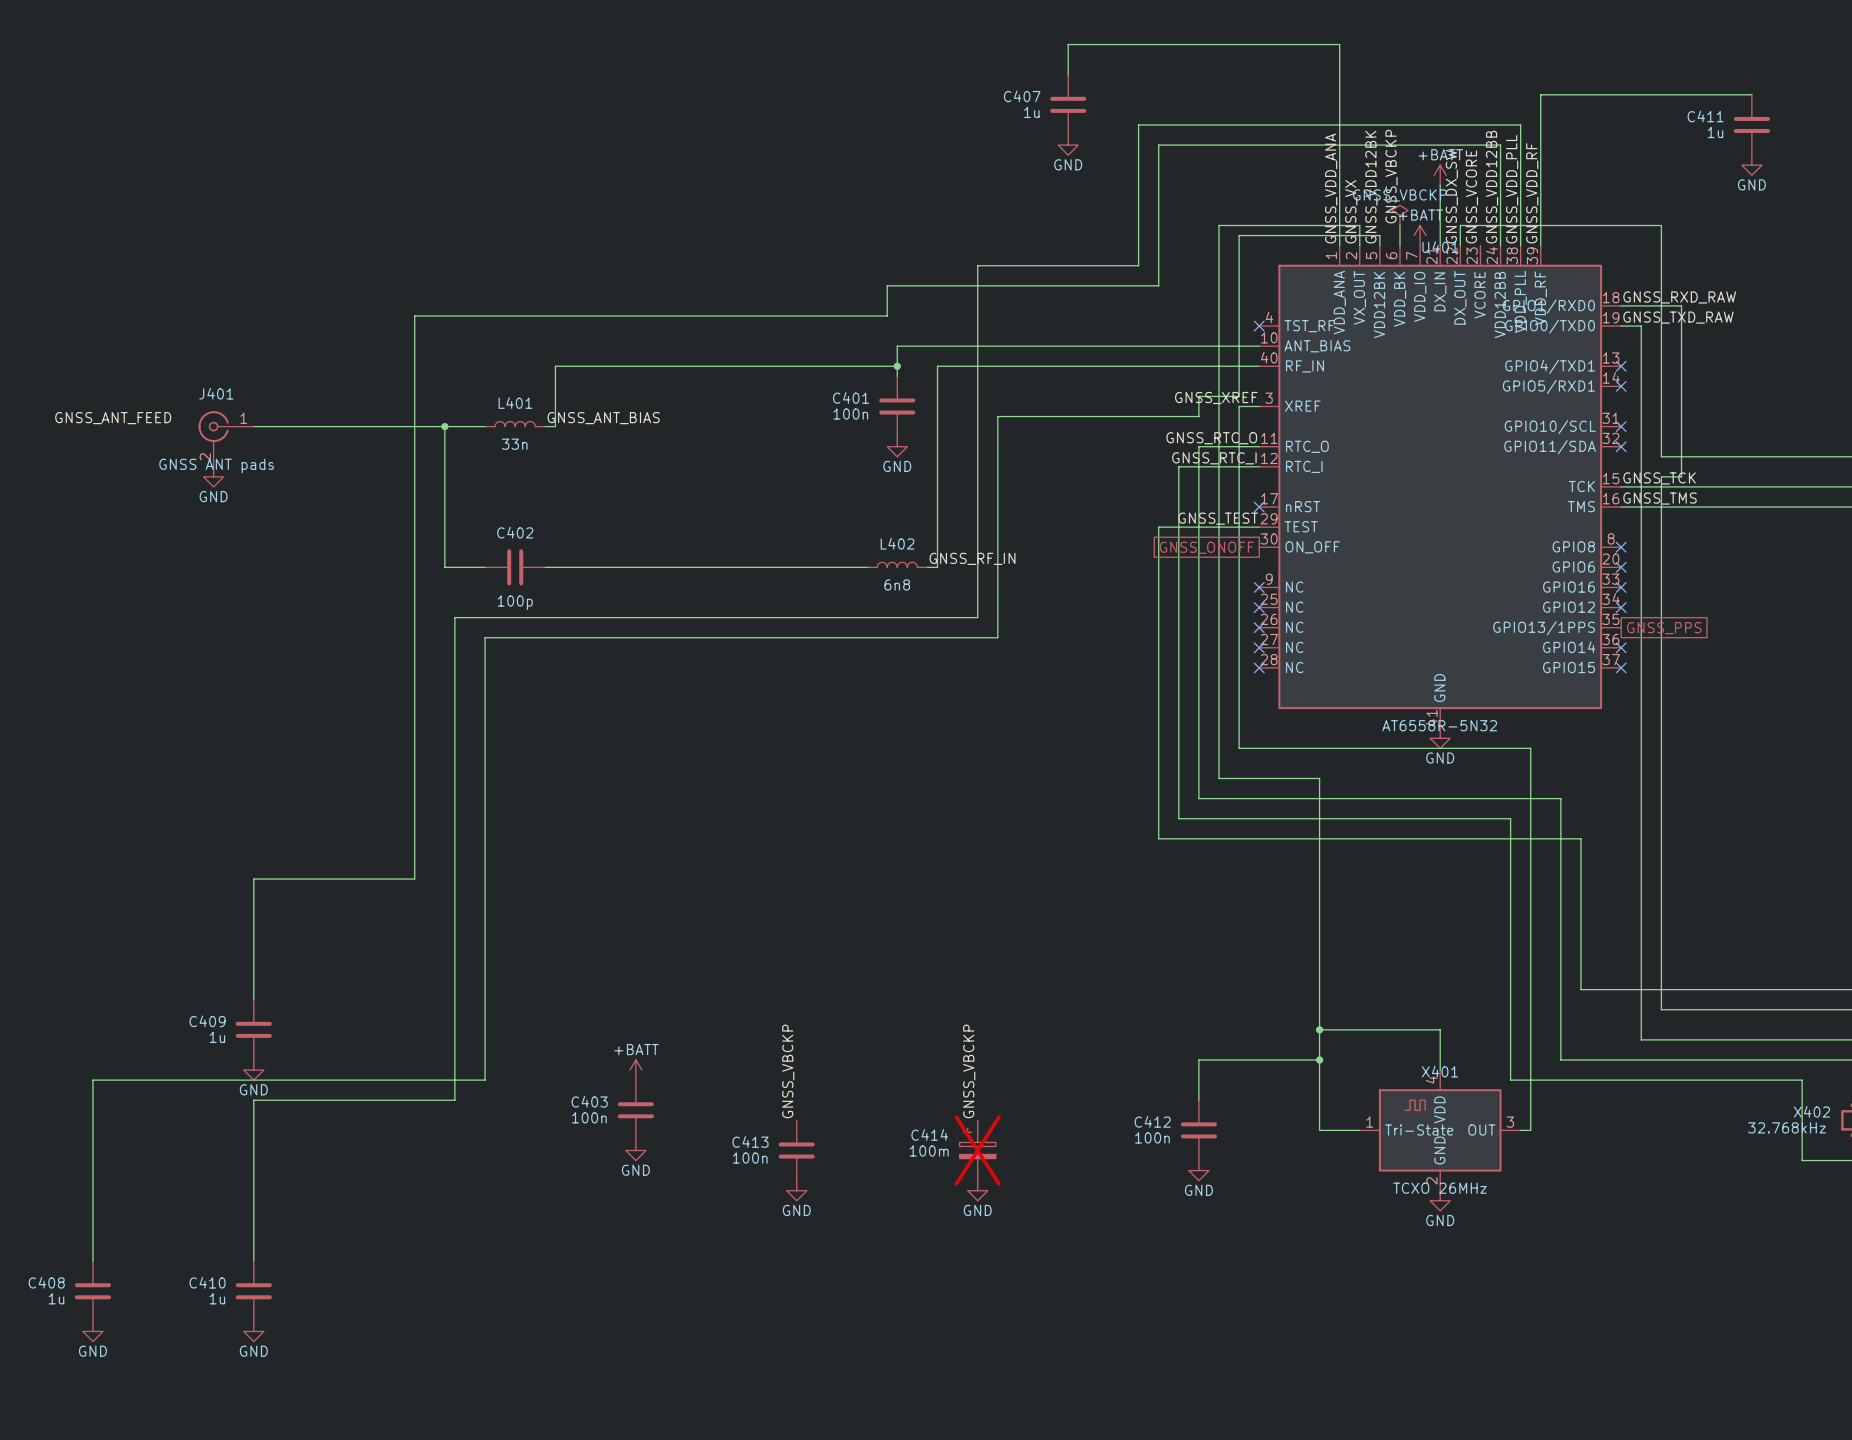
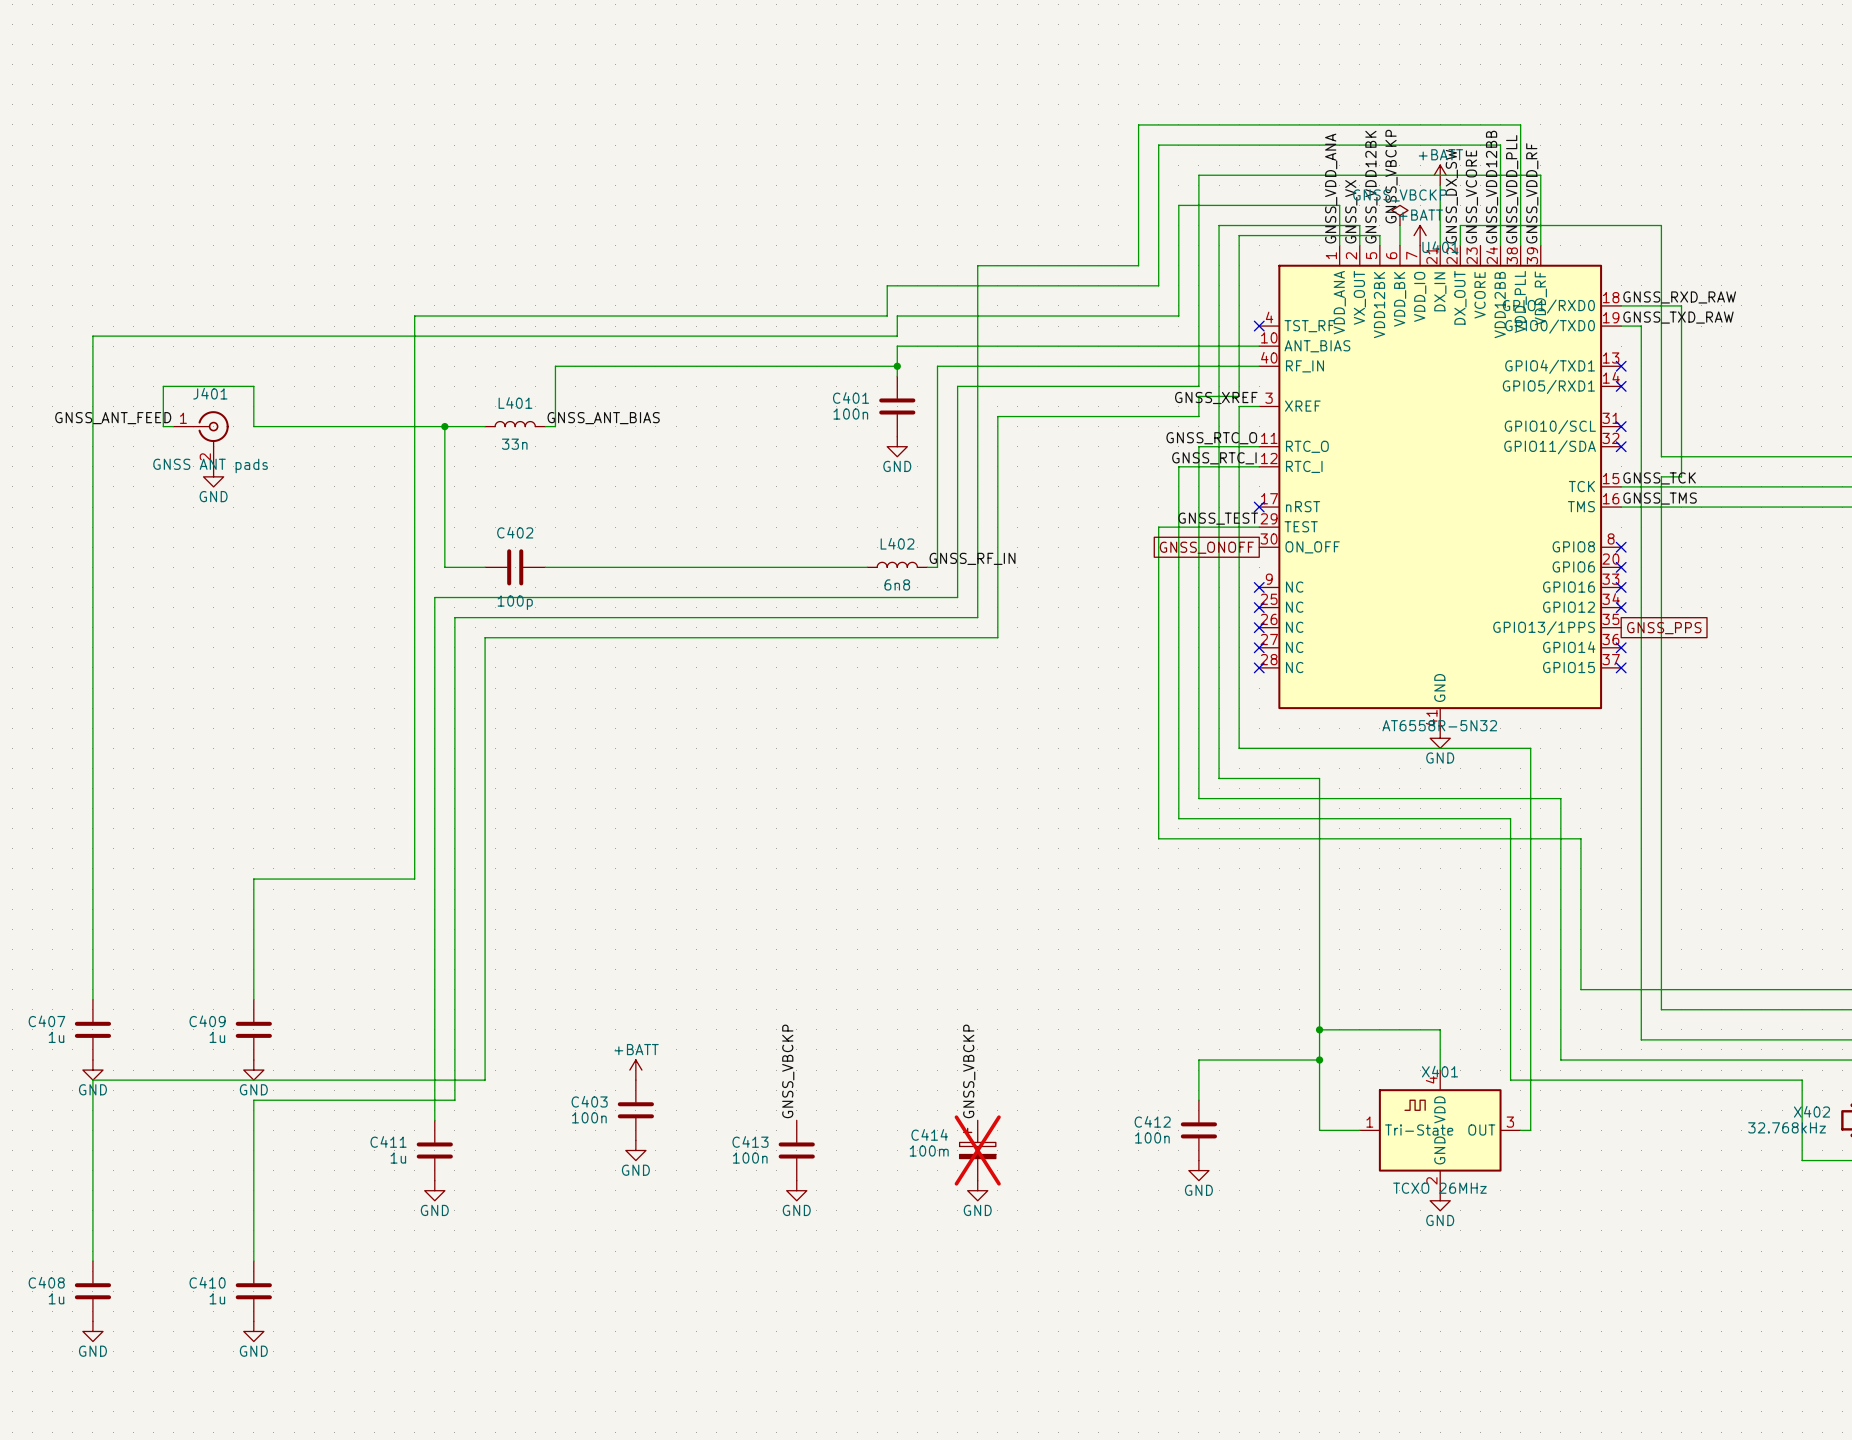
wire: (1068, 74) (1068, 44) (1339, 44) (1339, 205) -> (92, 999) (92, 336) (897, 336) (897, 316) (1178, 316) (1178, 205) (1339, 205)
wire: (1751, 94) (1540, 94) (1540, 175) -> (434, 1120) (434, 597) (957, 597) (957, 386) (1198, 386) (1198, 175) (1540, 175)
C407 position: (1068, 104) -> (92, 1029)
C411 position: (1751, 124) -> (434, 1150)
power symbol: GND (1068, 145) -> none
power symbol: GND (1751, 165) -> none
wire: none -> (173, 426) (163, 426) (163, 386) (253, 386) (253, 426)
J401 flip: as is (216, 428) -> left-right (211, 428)
power symbol: none -> GND (92, 1070)
power symbol: none -> GND (434, 1190)

